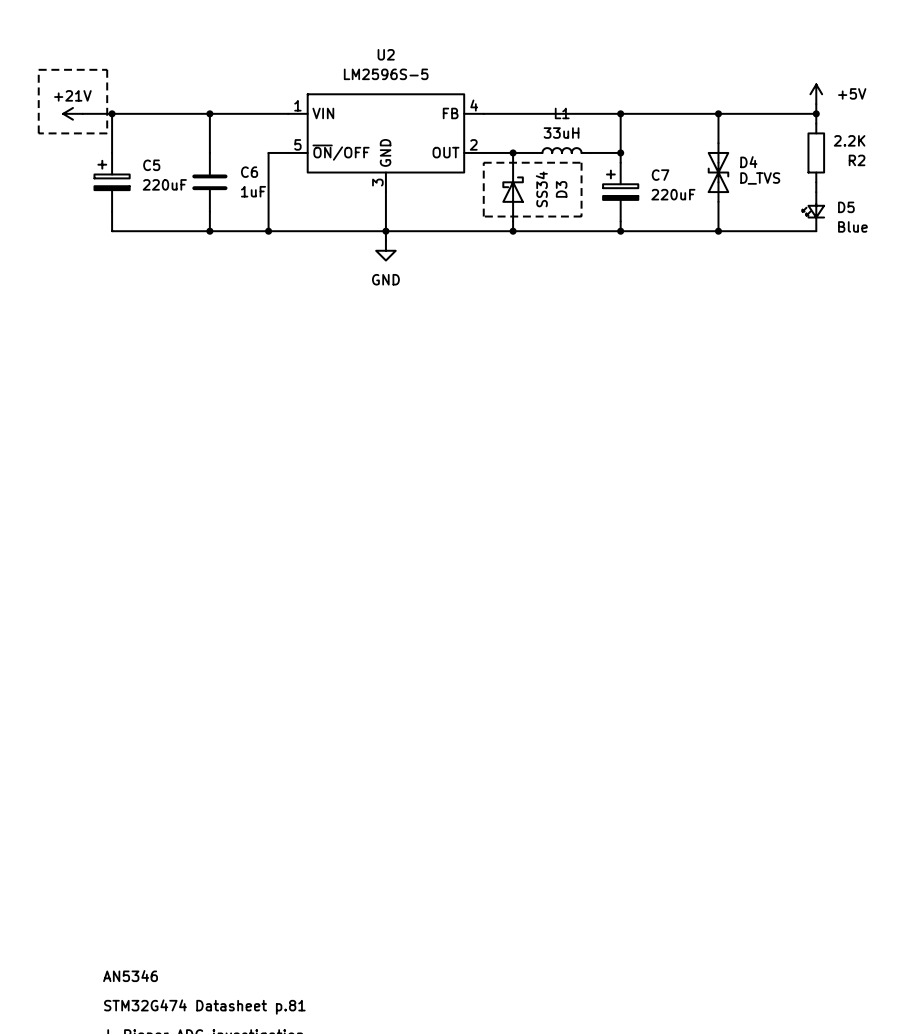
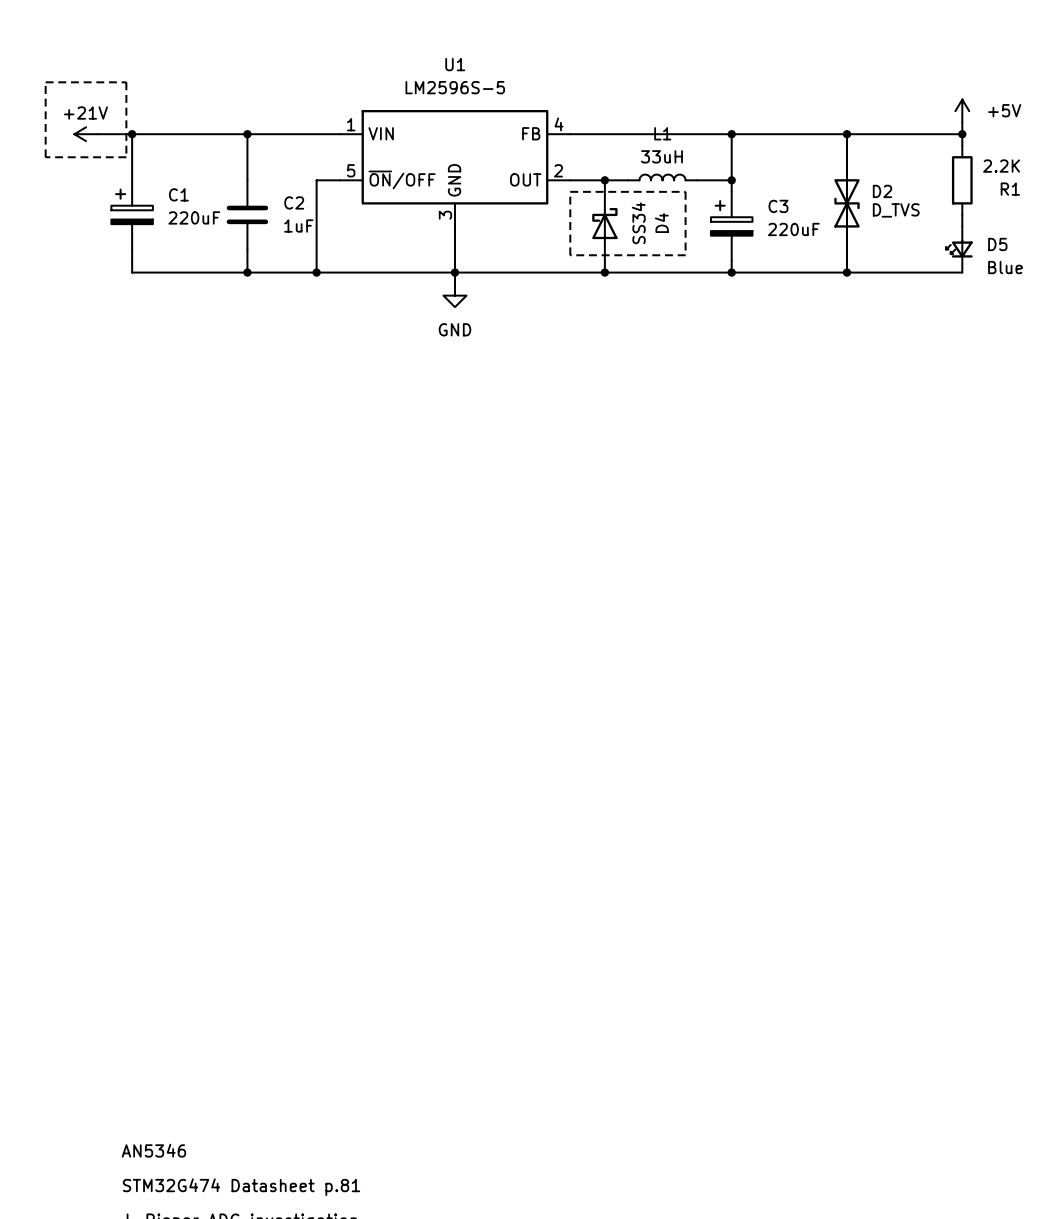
U2 name: U2 (386, 54) -> U1 (455, 64)
R2 name: R2 (857, 160) -> R1 (1010, 189)
D4 name: D4 (748, 162) -> D2 (882, 191)
C5 name: C5 (151, 165) -> C1 (178, 194)
C6 name: C6 (249, 172) -> C2 (294, 202)
C7 name: C7 (660, 175) -> C3 (778, 206)
D3 name: D3 (561, 189) -> D4 (661, 223)

